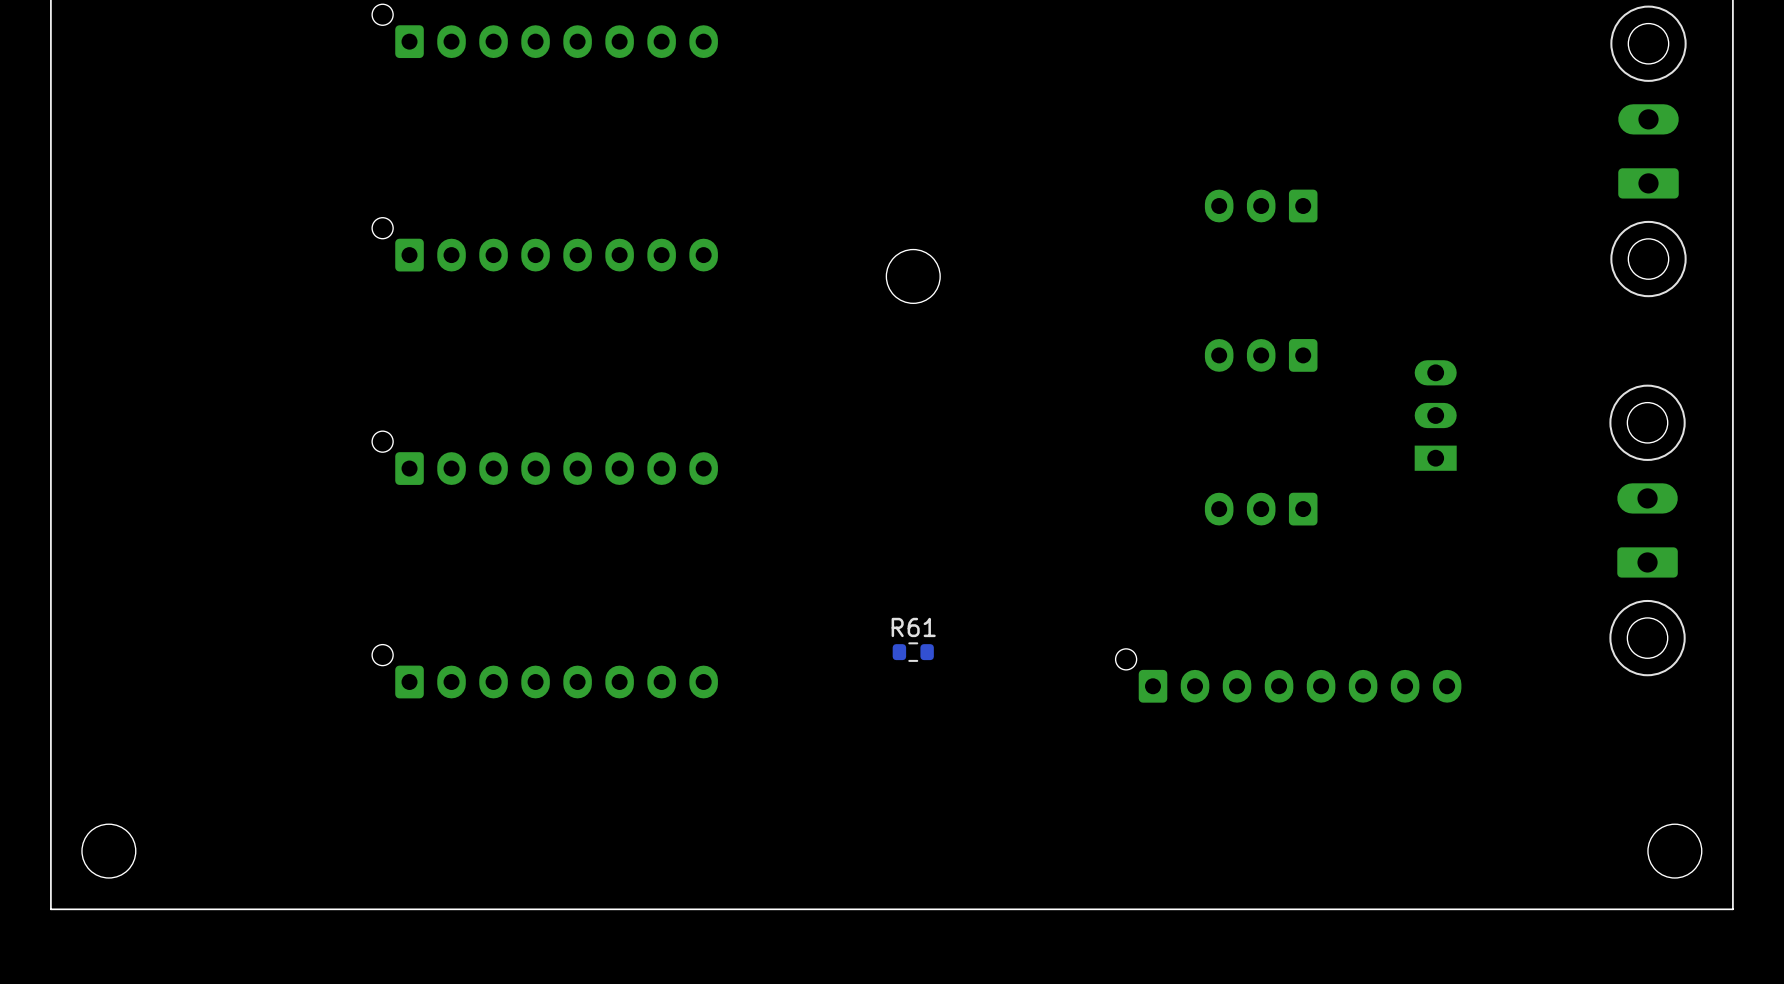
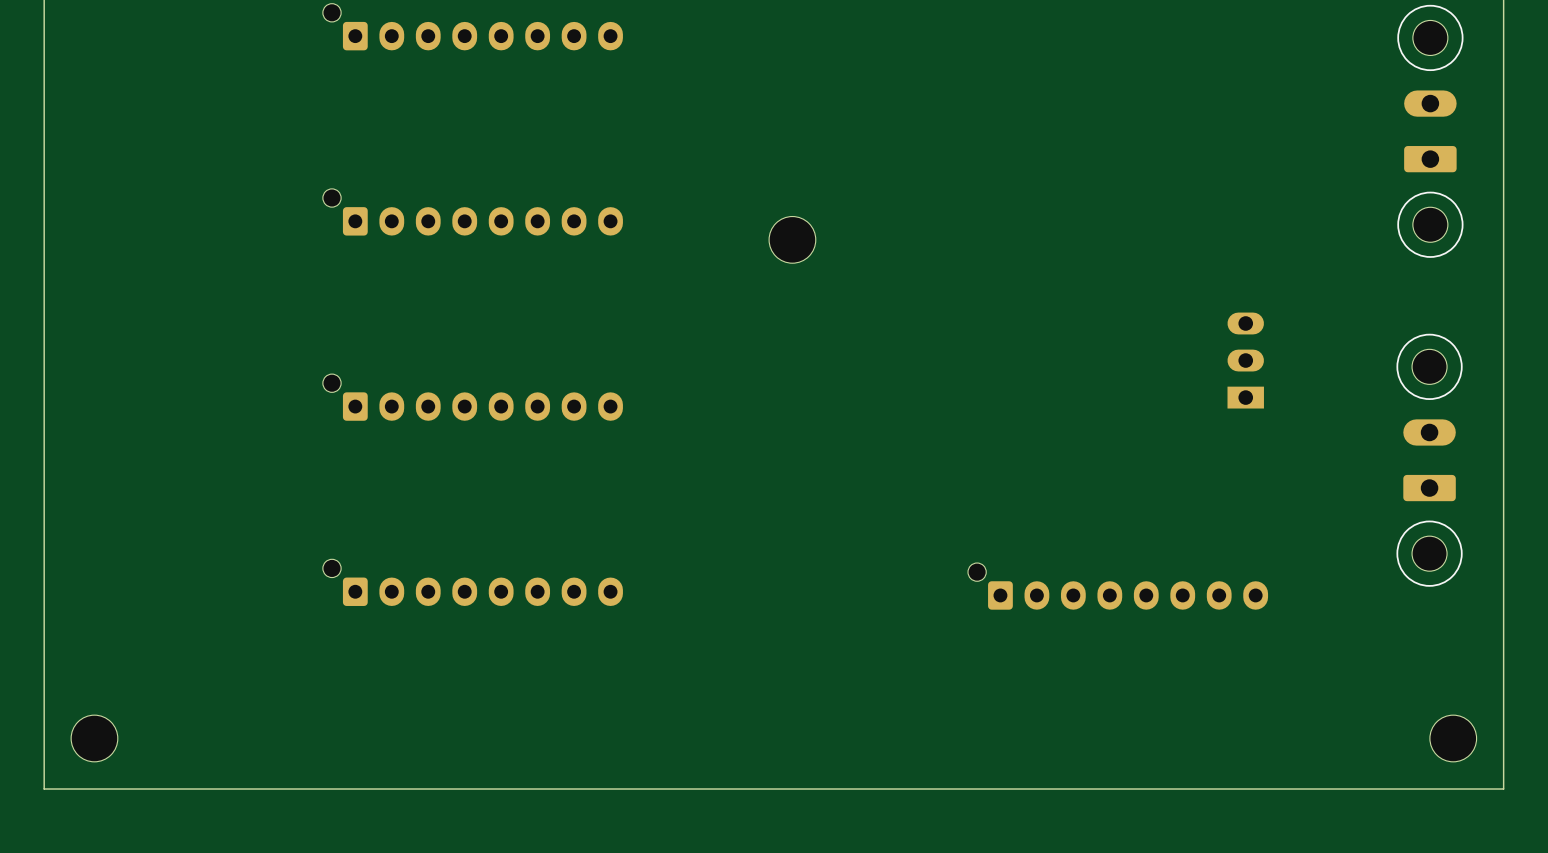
part: (1261, 206) -> none
part: (1261, 355) -> none
part: (1261, 509) -> none
R61: (913, 652) -> none

